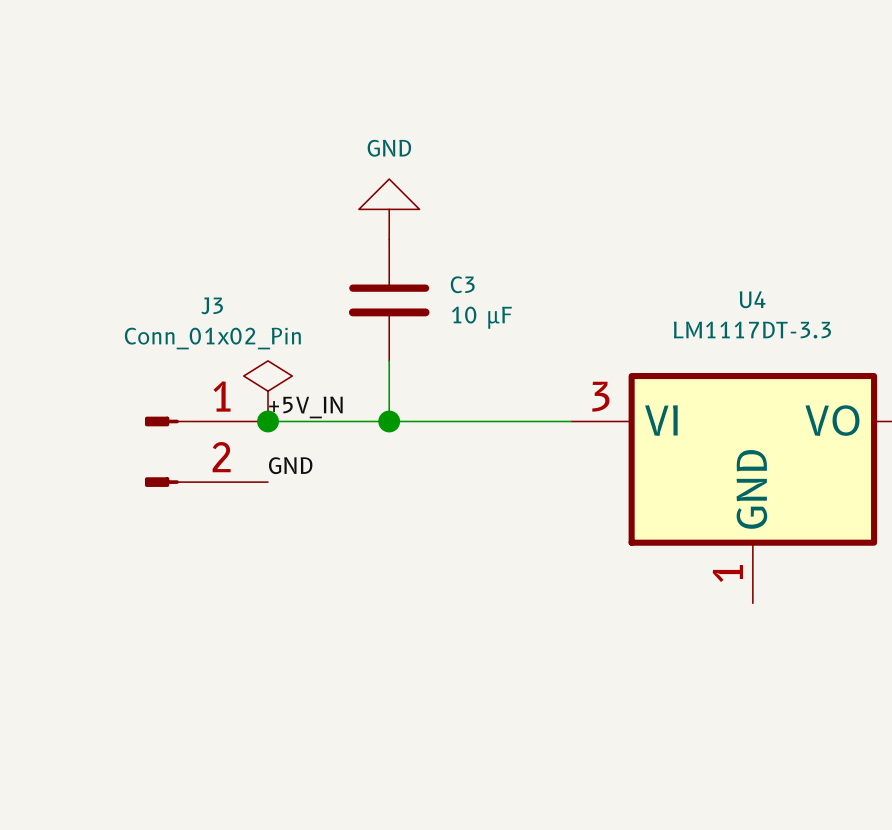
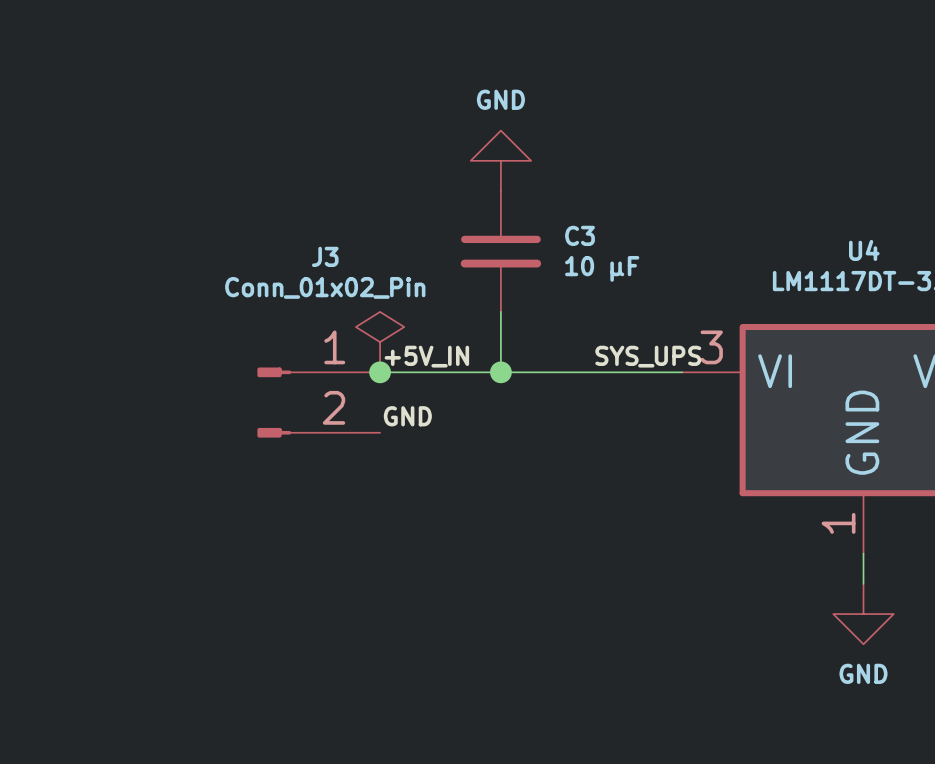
label: none -> SYS_UPS (648, 356)
wire: none -> (863, 553) (863, 583)
power symbol: none -> GND (863, 614)

